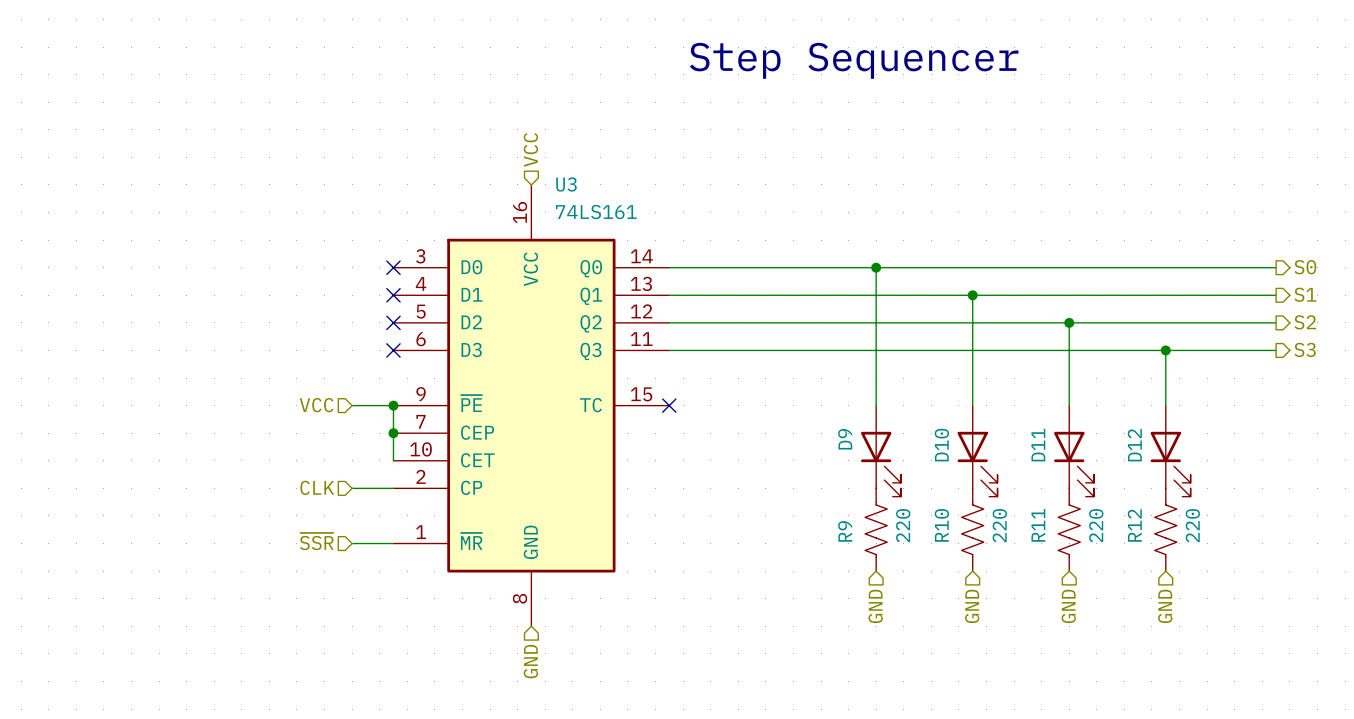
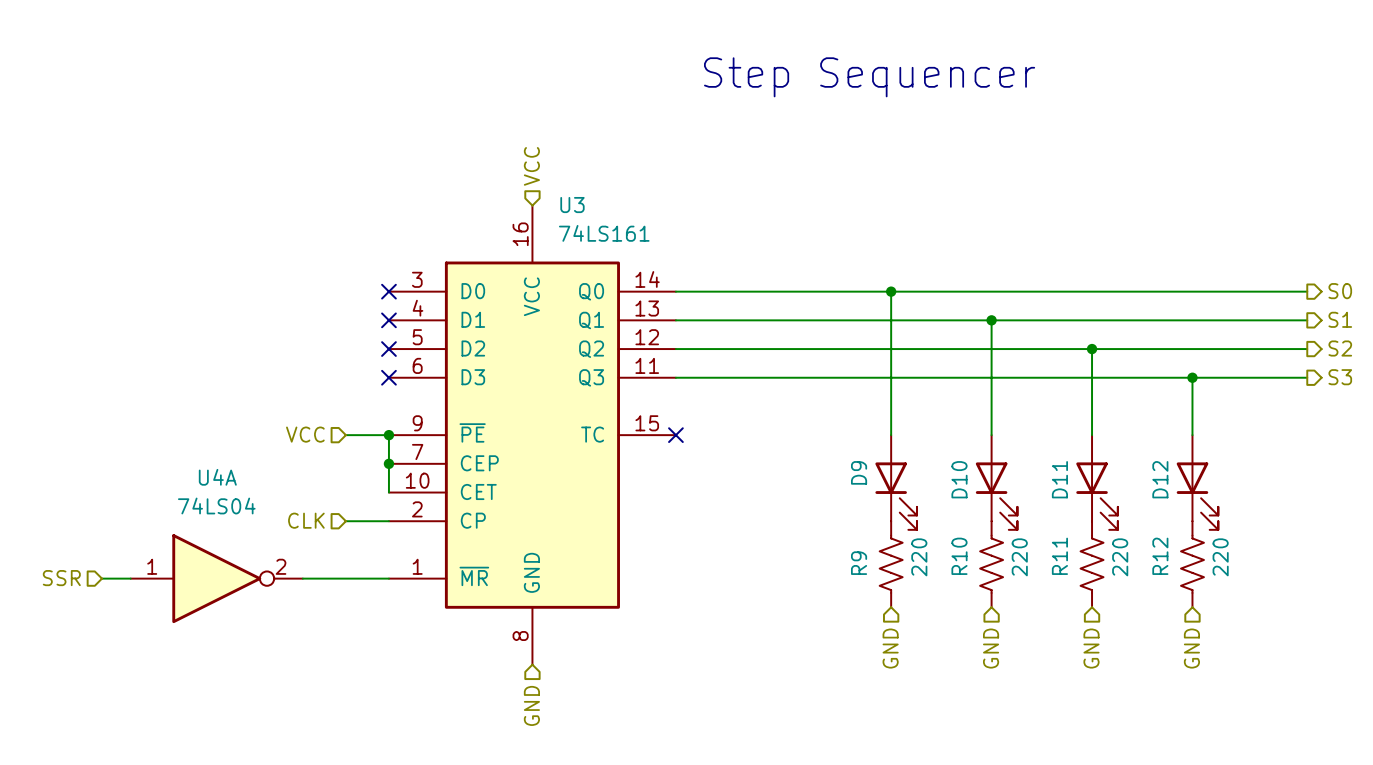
hierarchical label: ~{SSR} (316, 541) -> none
hierarchical label: none -> SSR (61, 578)
wire: none -> (101, 578) (130, 578)
U4A: none -> 74LS04 (216, 578)
wire: none -> (302, 578) (345, 578)

